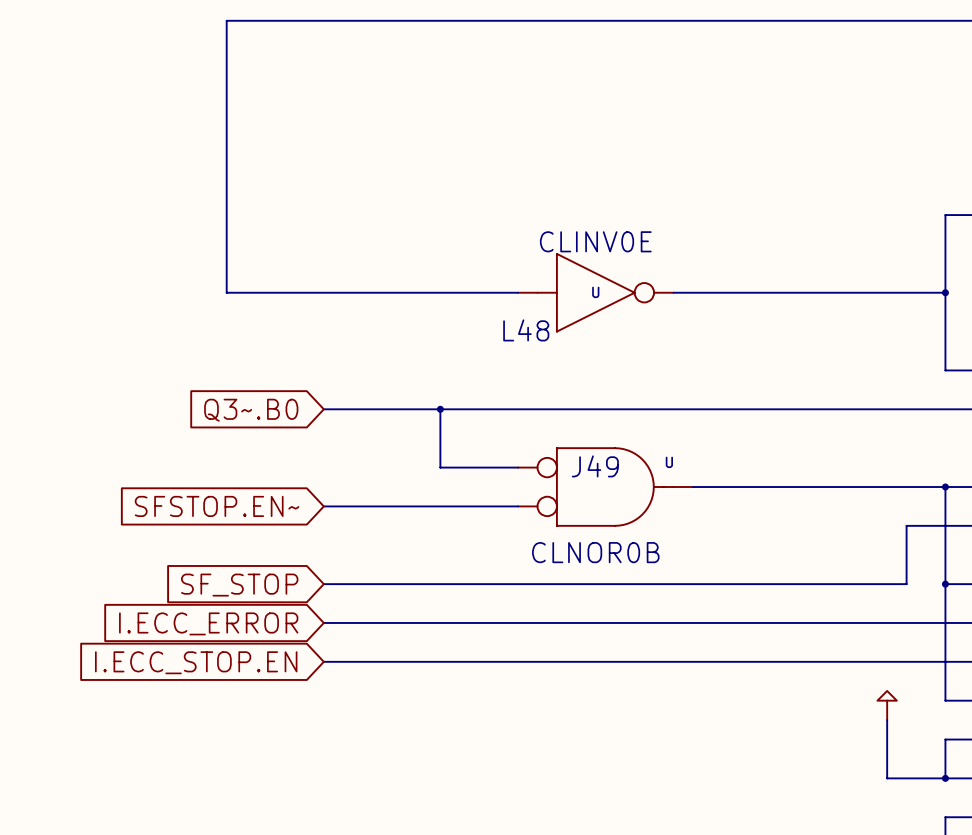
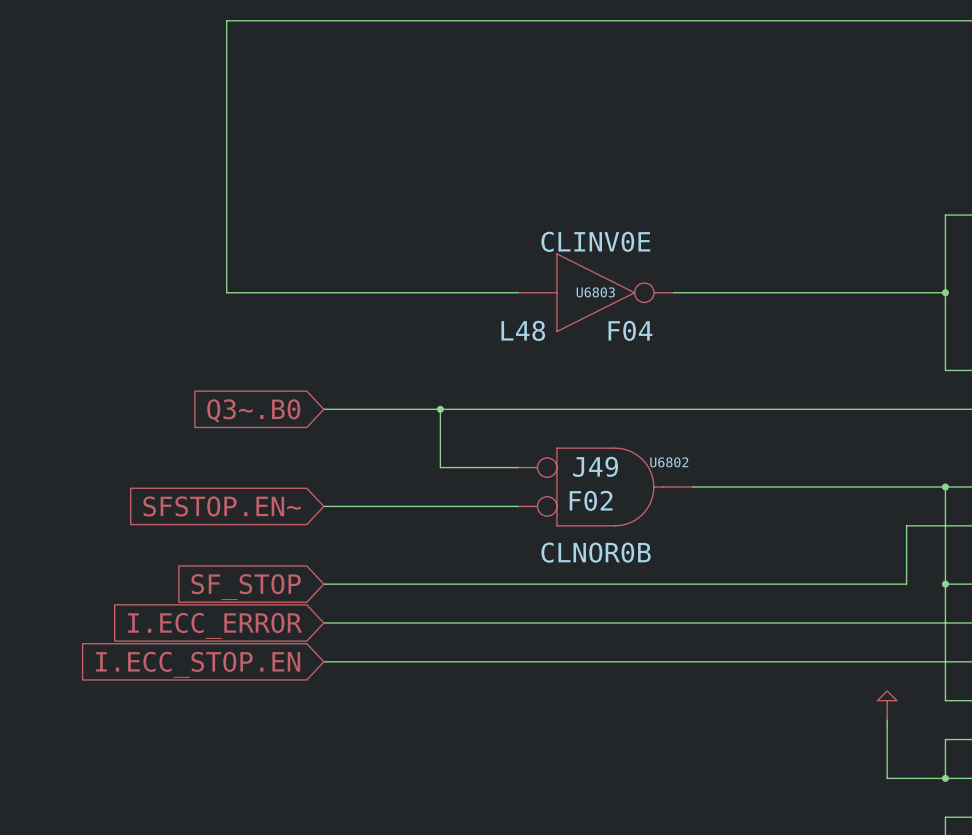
U name: U (595, 292) -> U6803 (595, 292)
U value: none -> F04 (630, 330)
U name: U (669, 462) -> U6802 (669, 462)
U value: none -> F02 (591, 500)

